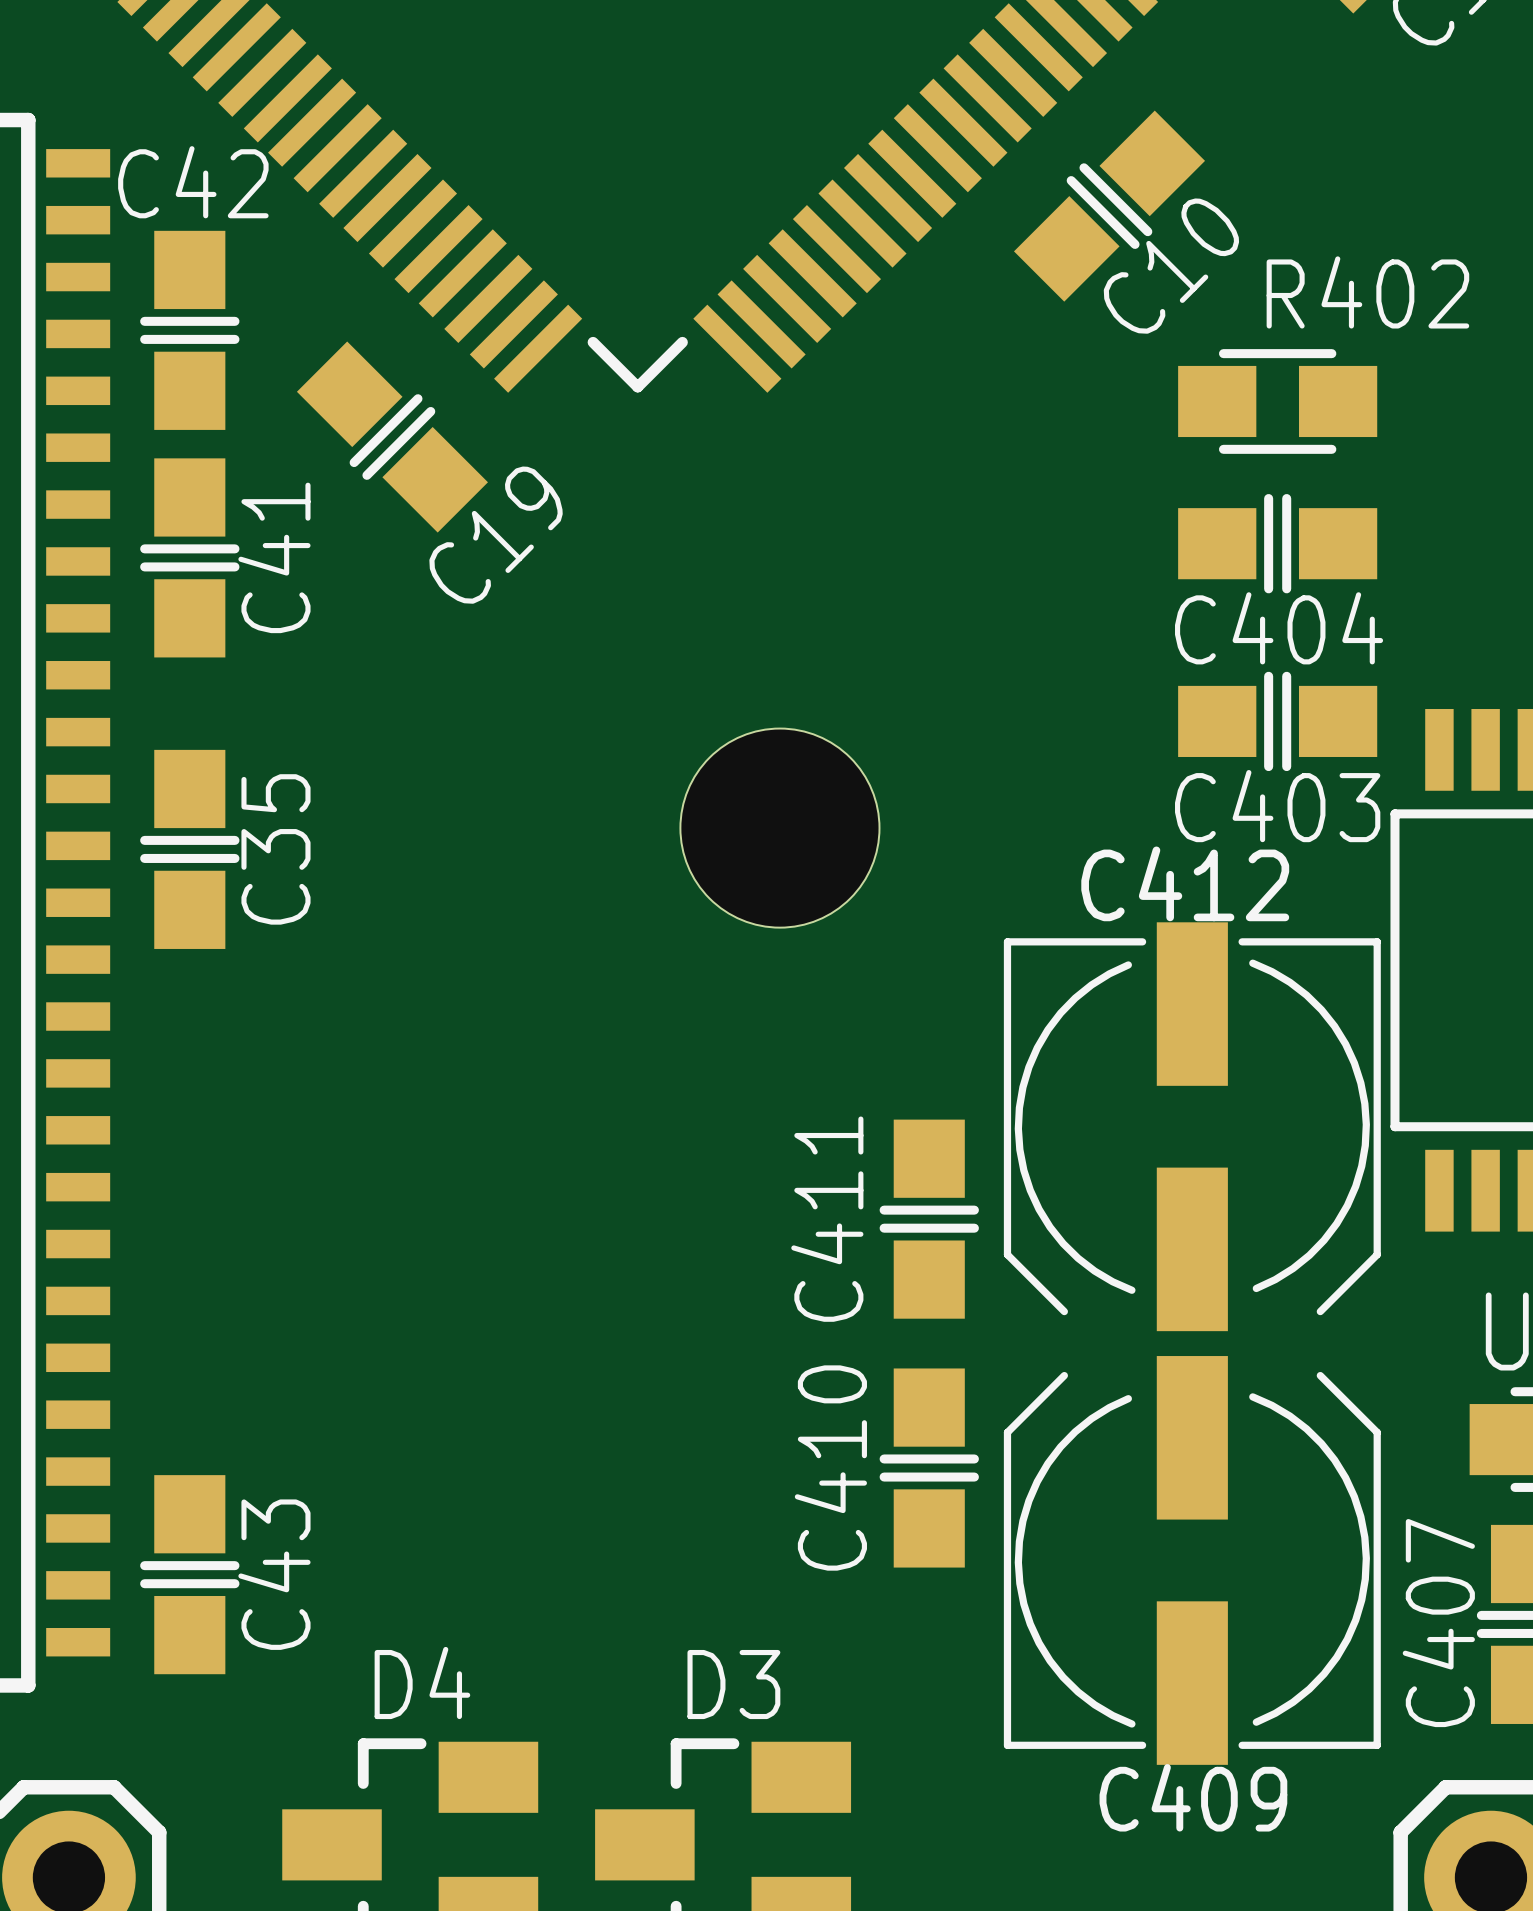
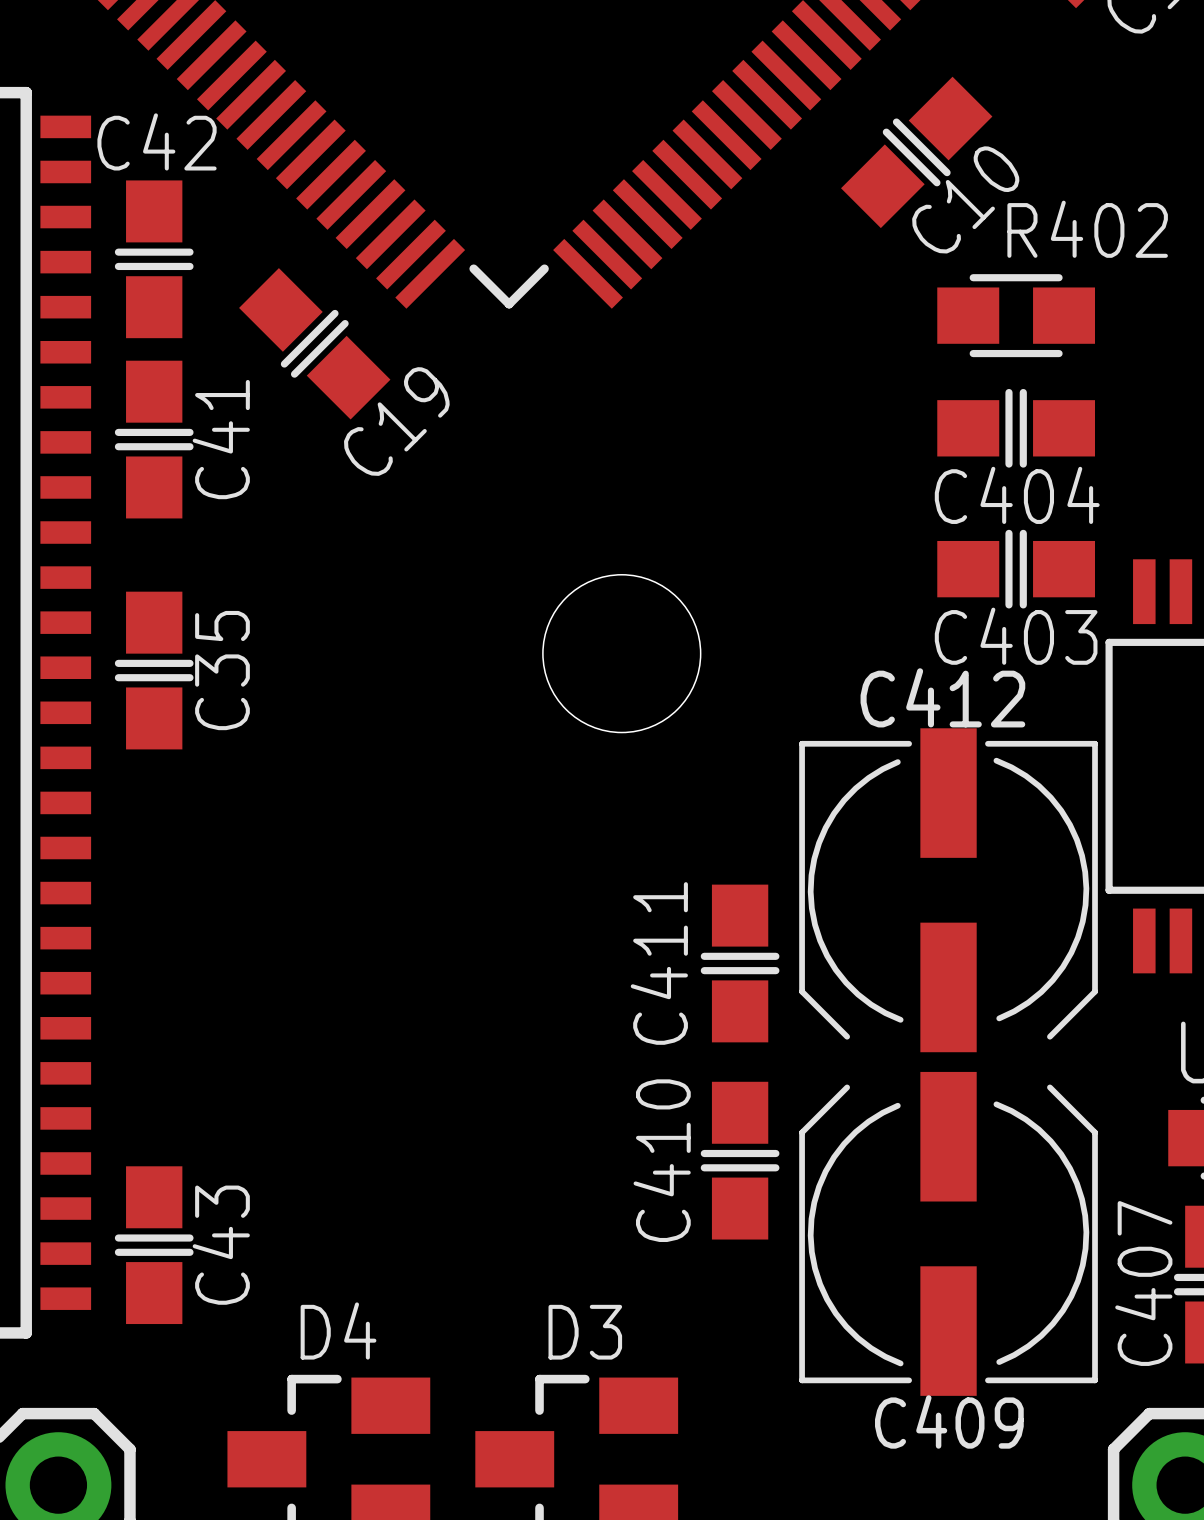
C10 position: (1109, 206) -> (916, 152)

